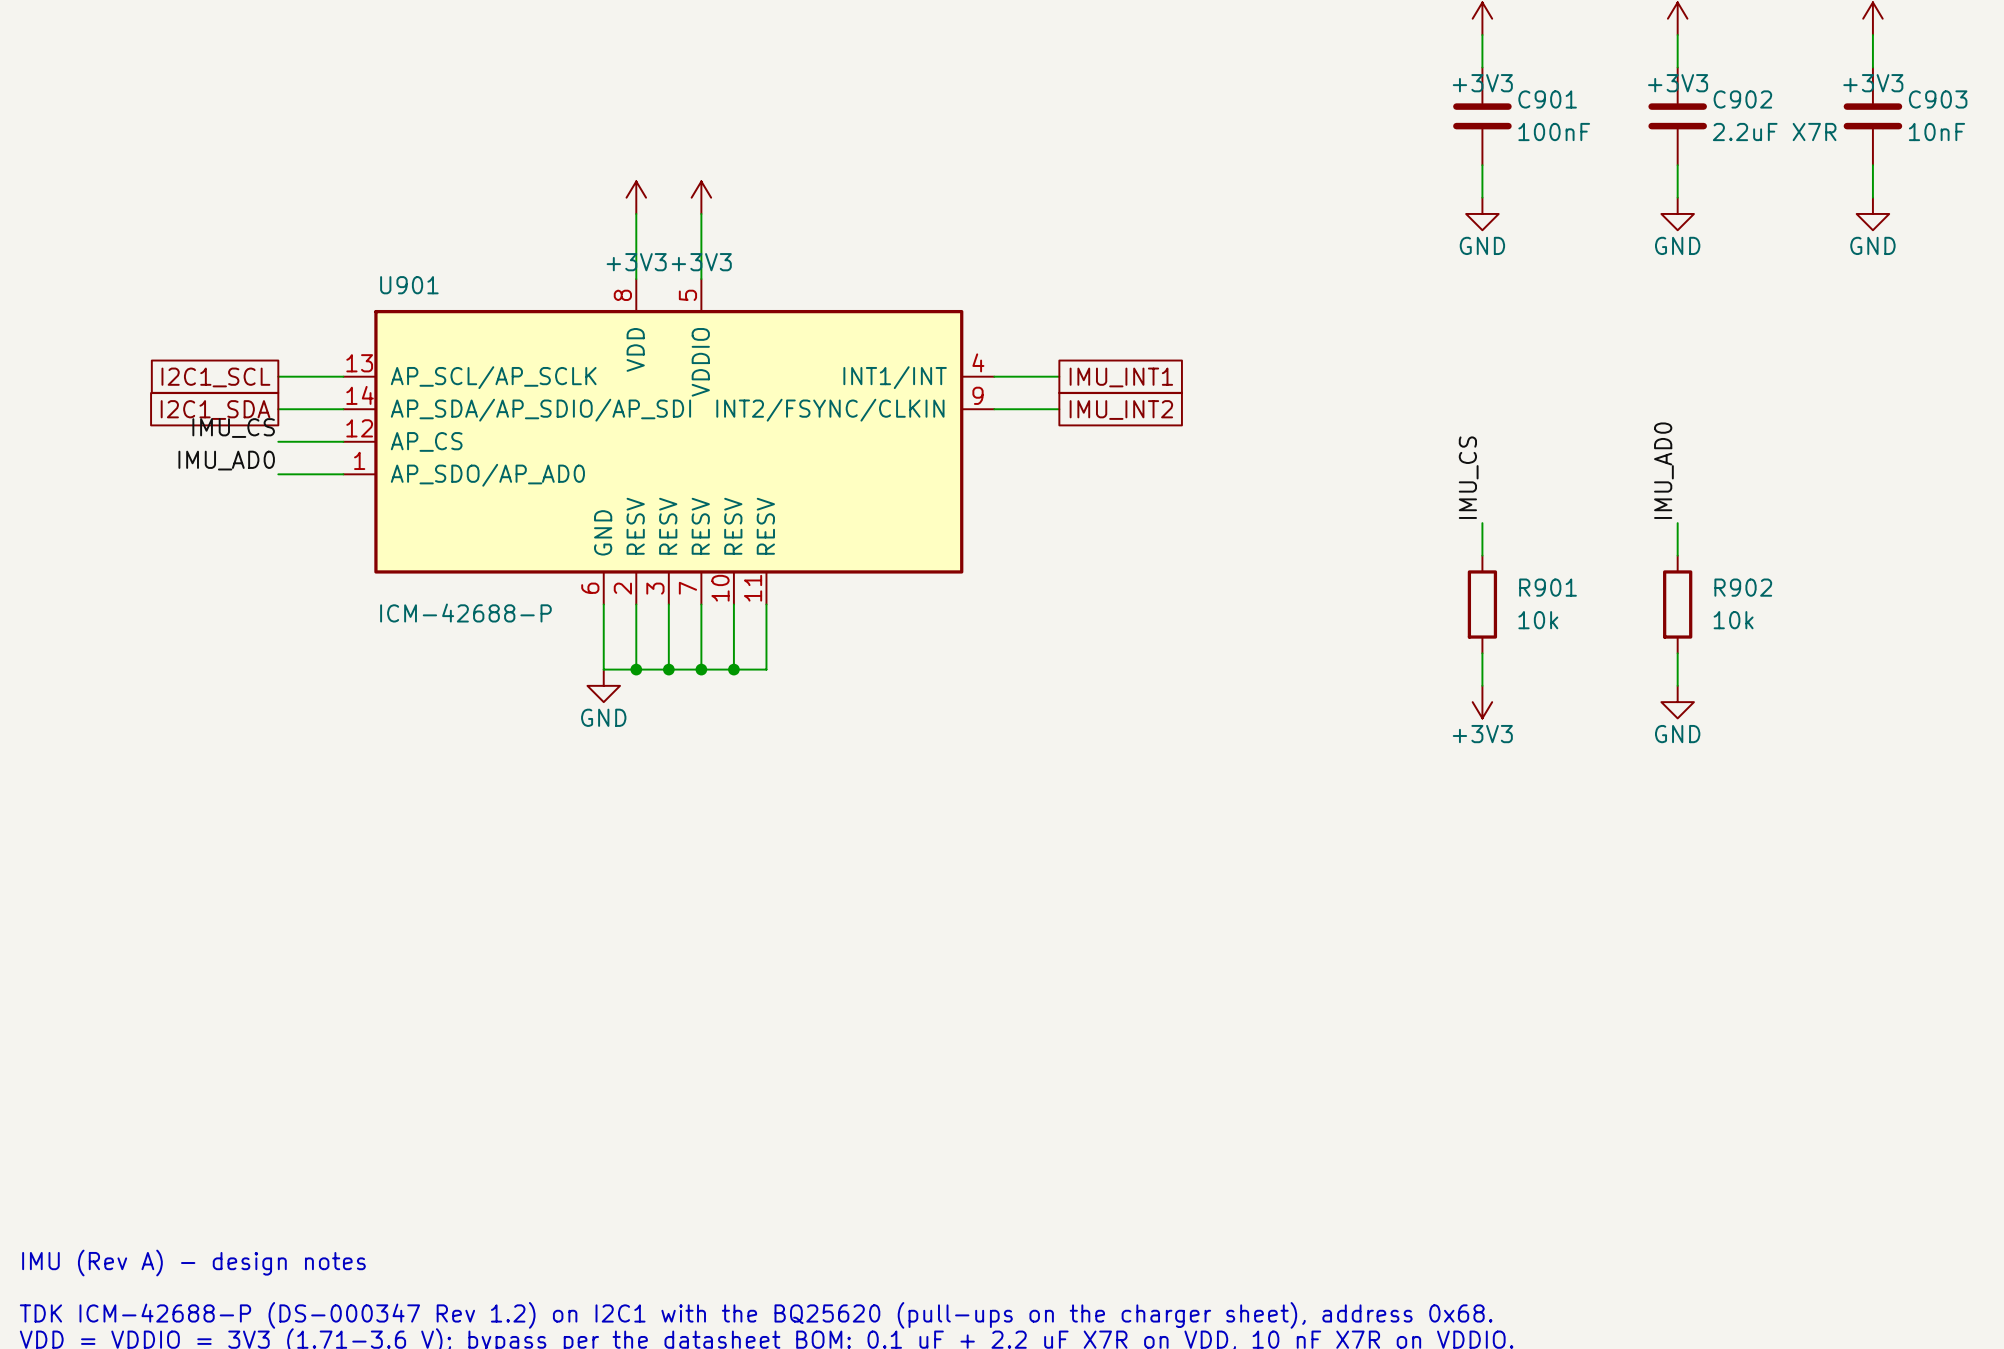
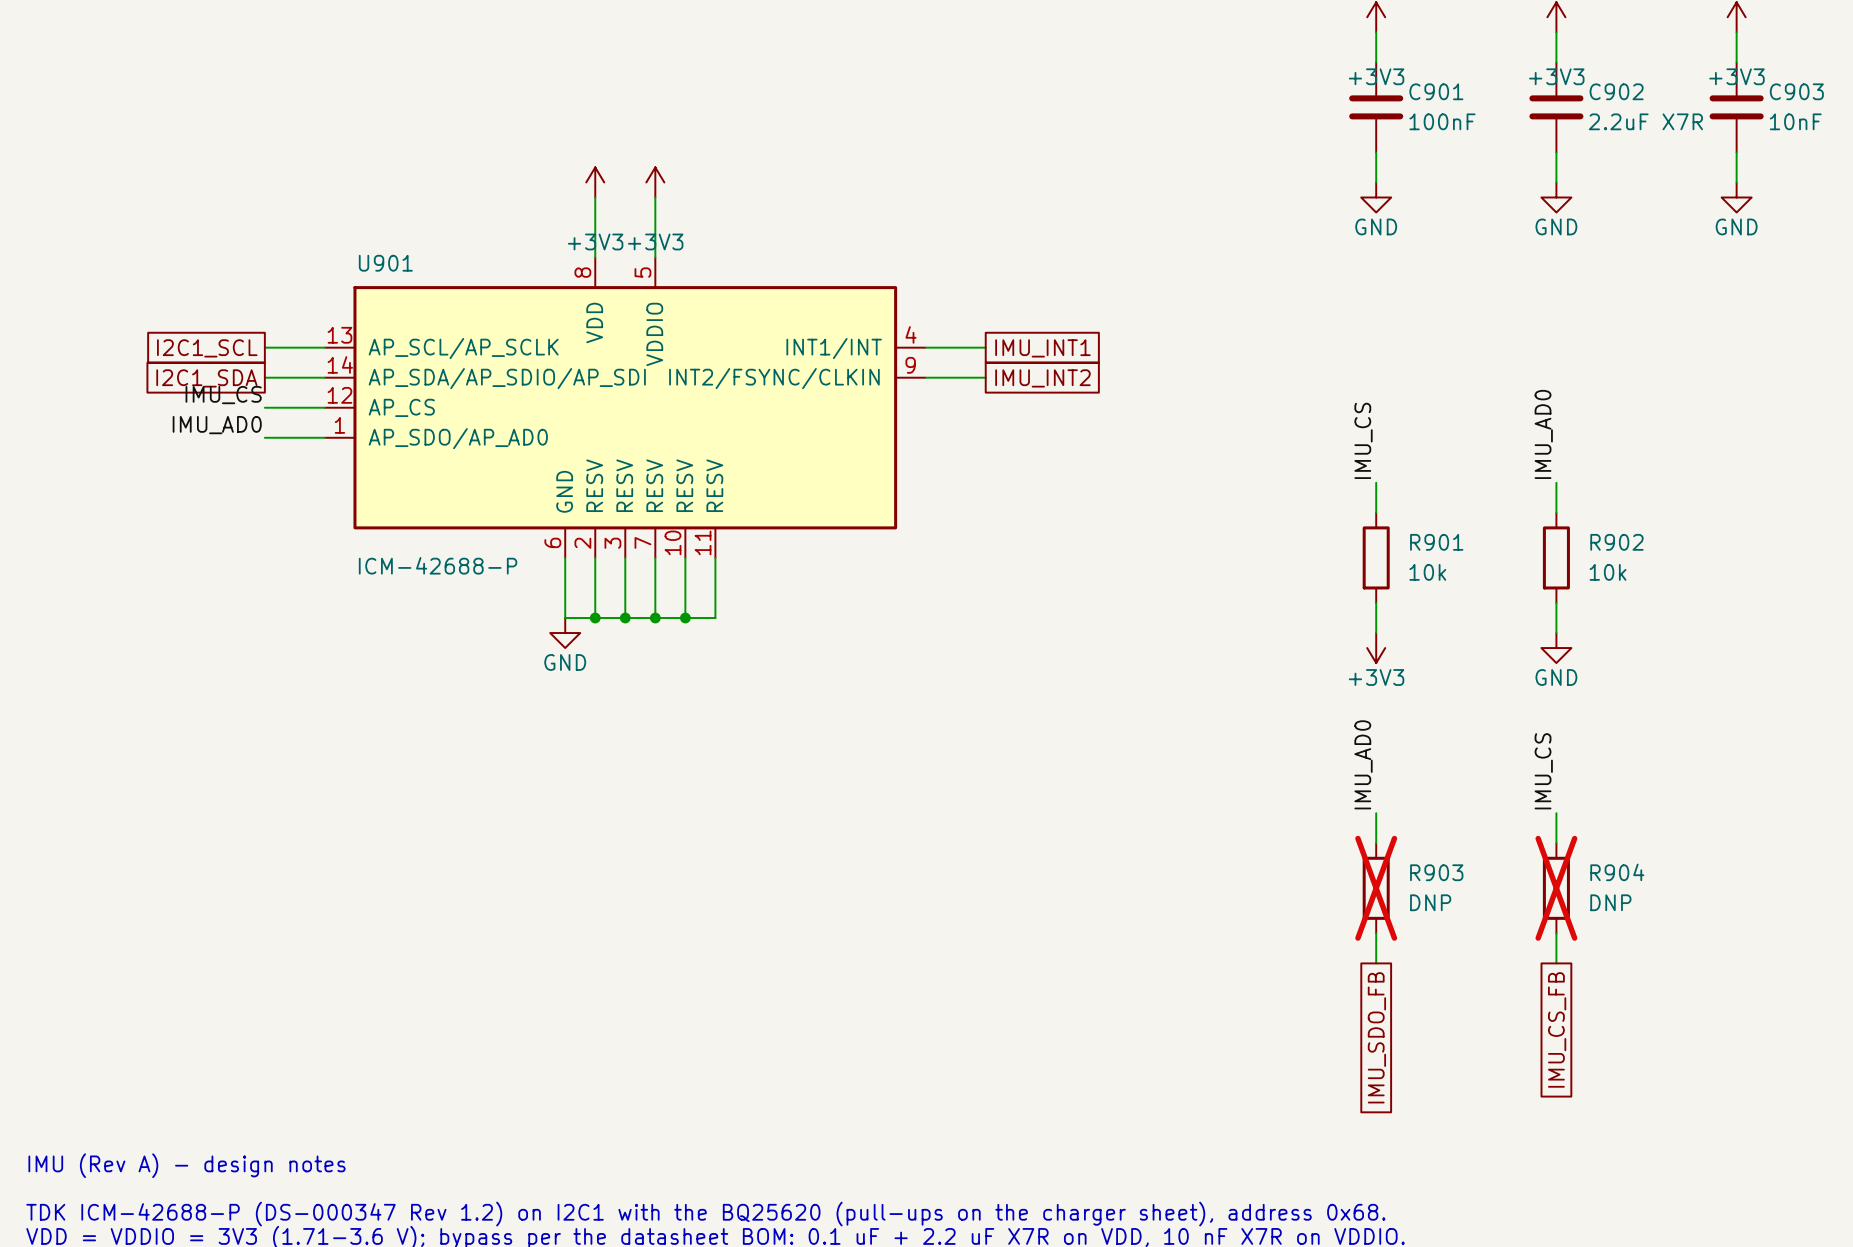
label: none -> IMU_AD0 (1363, 764)
label: none -> IMU_CS (1543, 771)
wire: none -> (1376, 813) (1376, 843)
wire: none -> (1556, 813) (1556, 843)
R903: none -> DNP (1376, 888)
R904: none -> DNP (1556, 888)
wire: none -> (1376, 933) (1376, 963)
wire: none -> (1556, 933) (1556, 963)
global label: none -> IMU_CS_FB (1557, 1029)
global label: none -> IMU_SDO_FB (1376, 1037)

